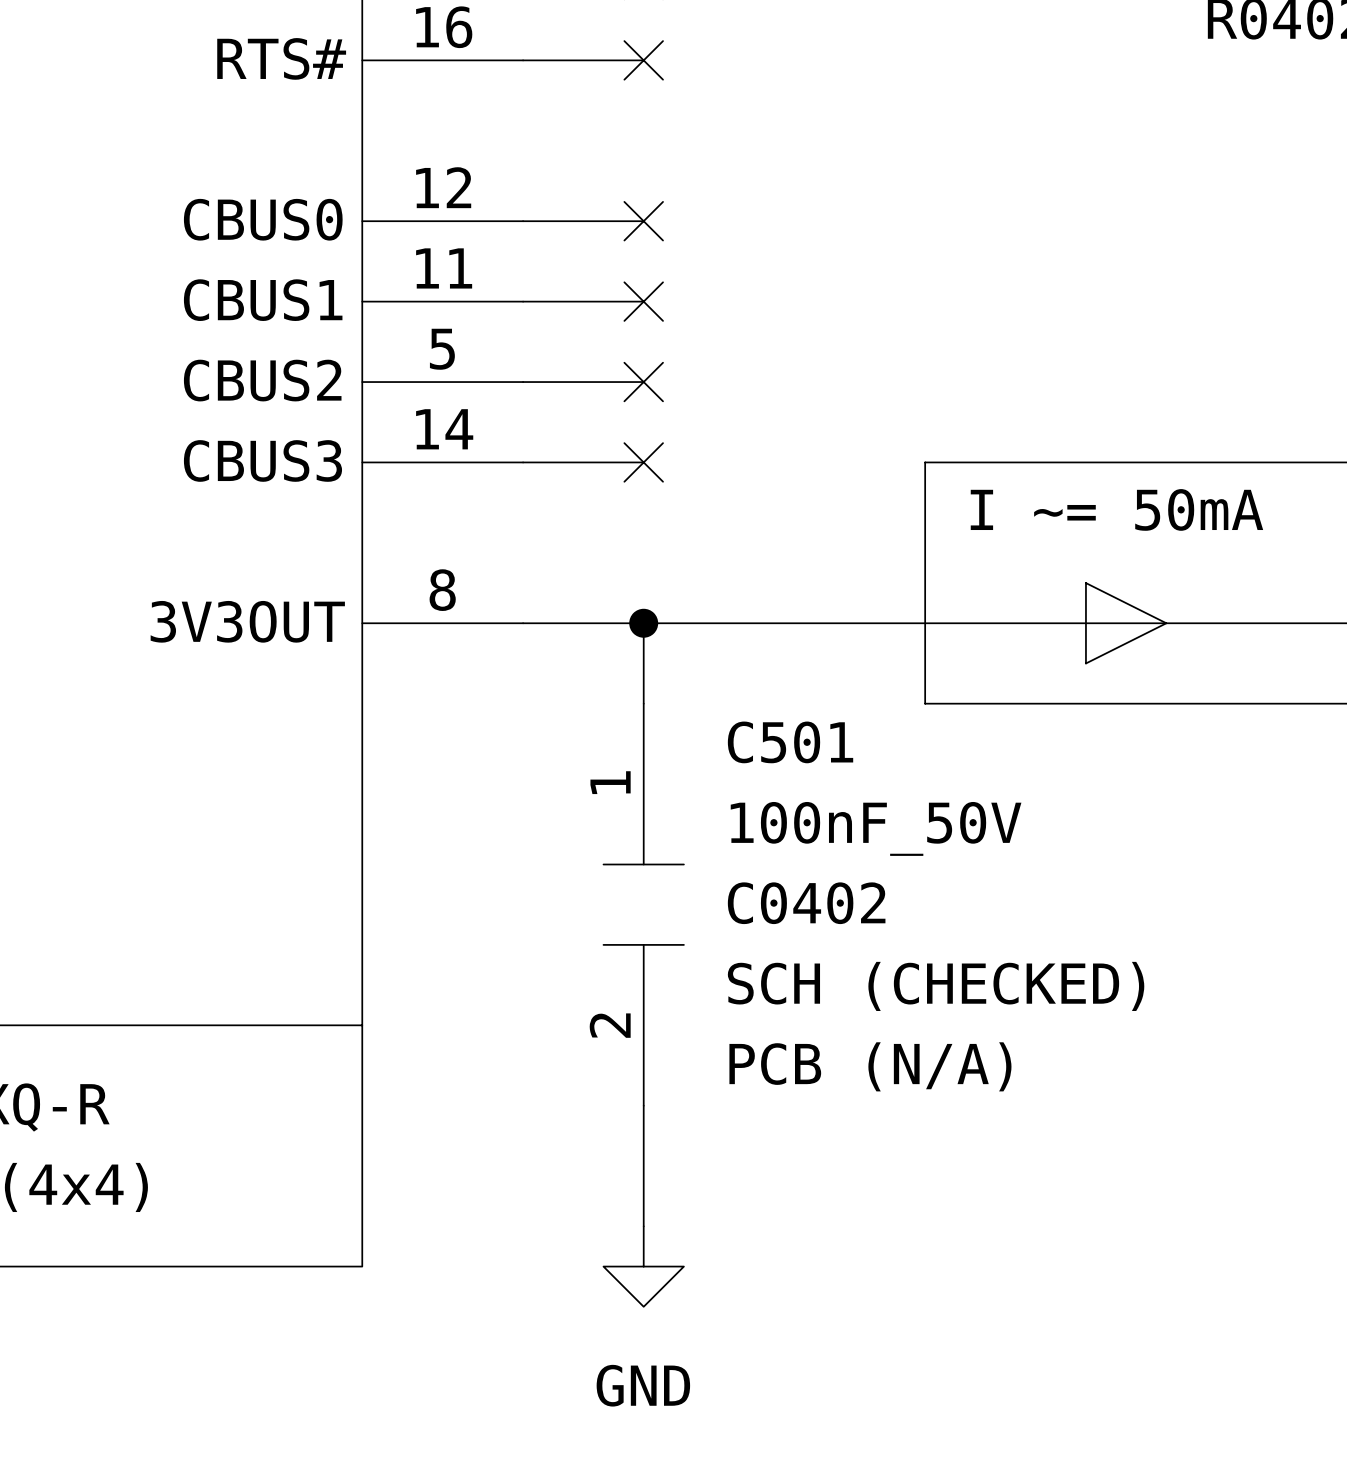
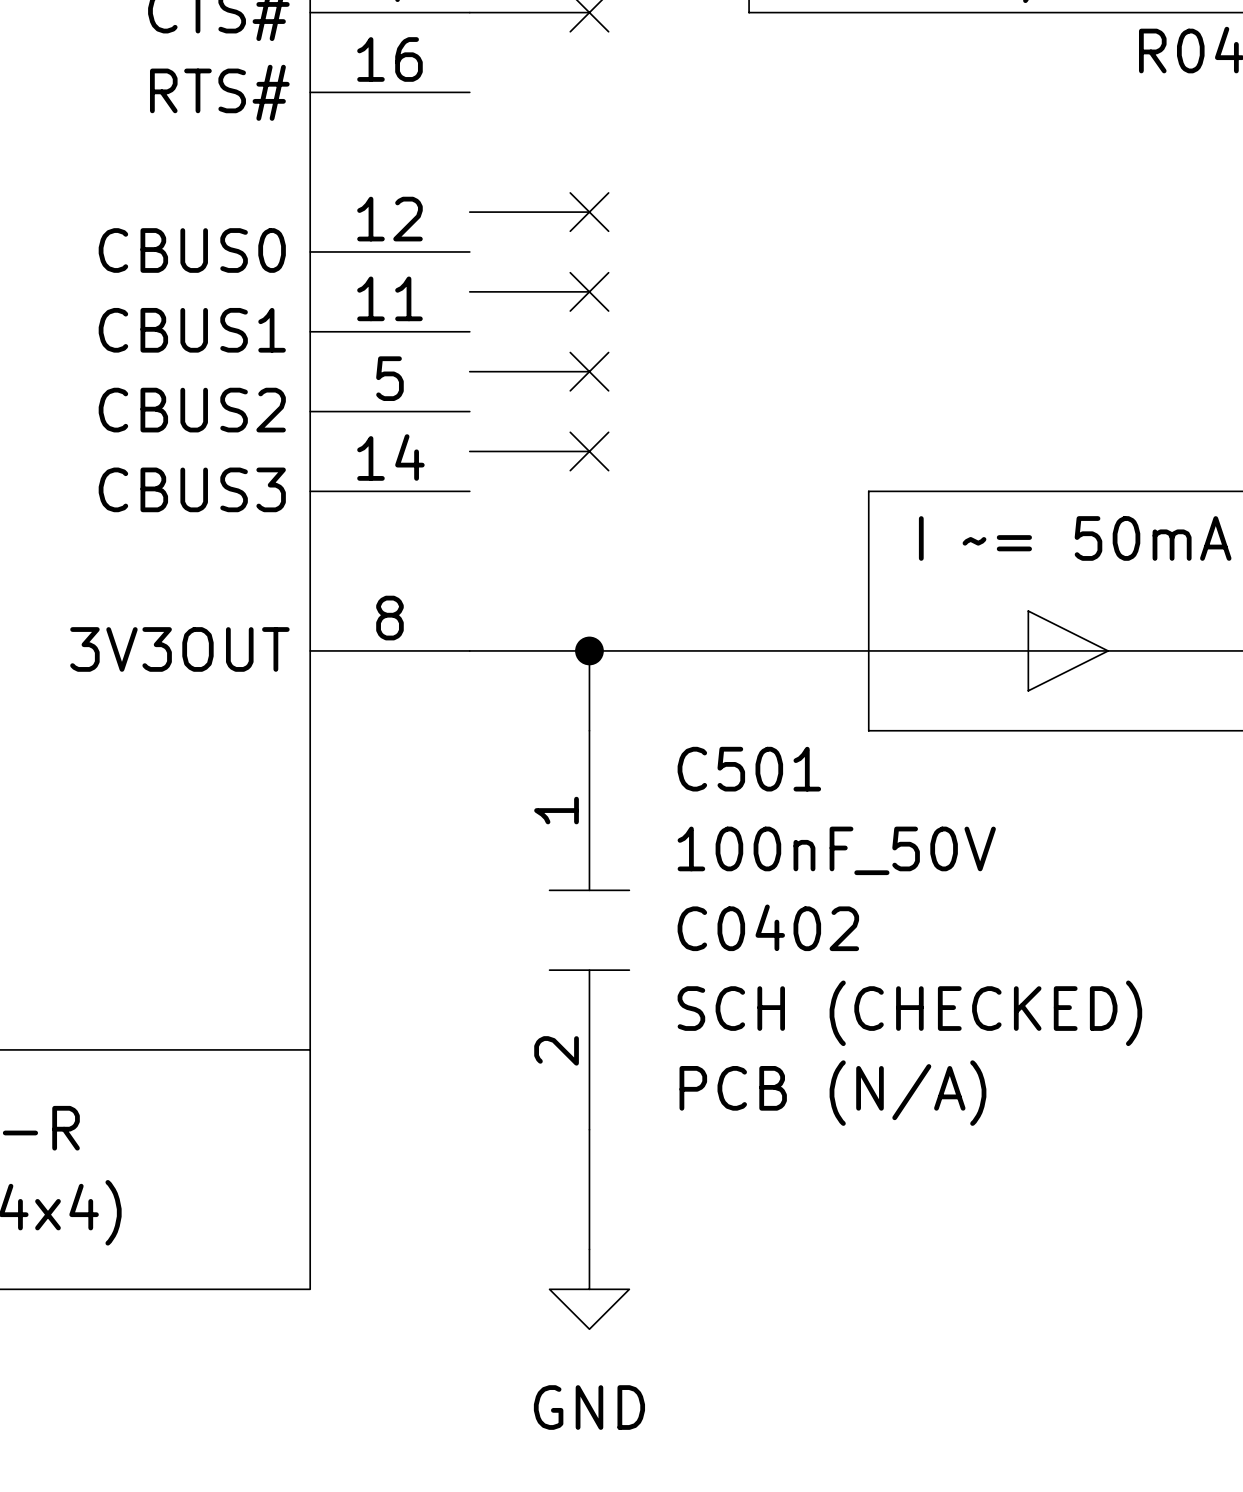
wire: (523, 60) (643, 60) -> none
no-connect mark: (643, 60) -> none
no-connect mark: none -> (589, 212)
wire: (523, 221) (643, 221) -> (469, 212) (589, 212)
no-connect mark: (643, 221) -> none
no-connect mark: none -> (589, 291)
wire: (523, 301) (643, 301) -> (469, 291) (589, 291)
no-connect mark: (643, 301) -> none
no-connect mark: none -> (589, 371)
wire: (523, 382) (643, 382) -> (469, 371) (589, 371)
no-connect mark: (643, 382) -> none
no-connect mark: none -> (589, 451)
wire: (523, 462) (643, 462) -> (469, 451) (589, 451)
no-connect mark: (643, 462) -> none

